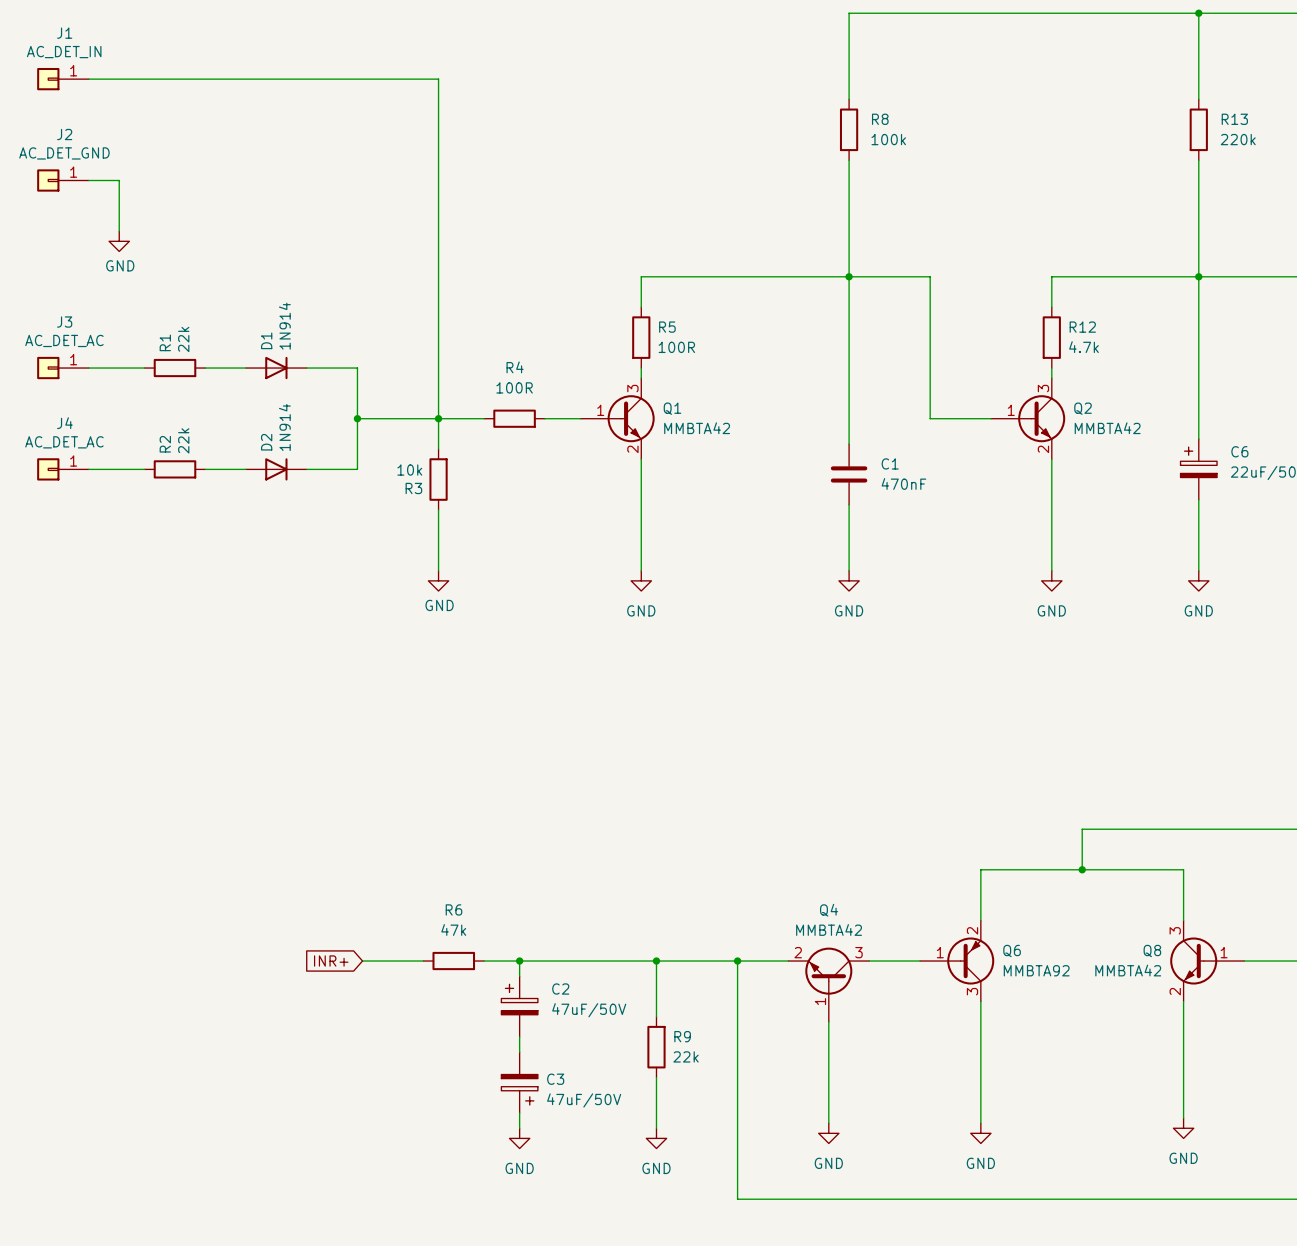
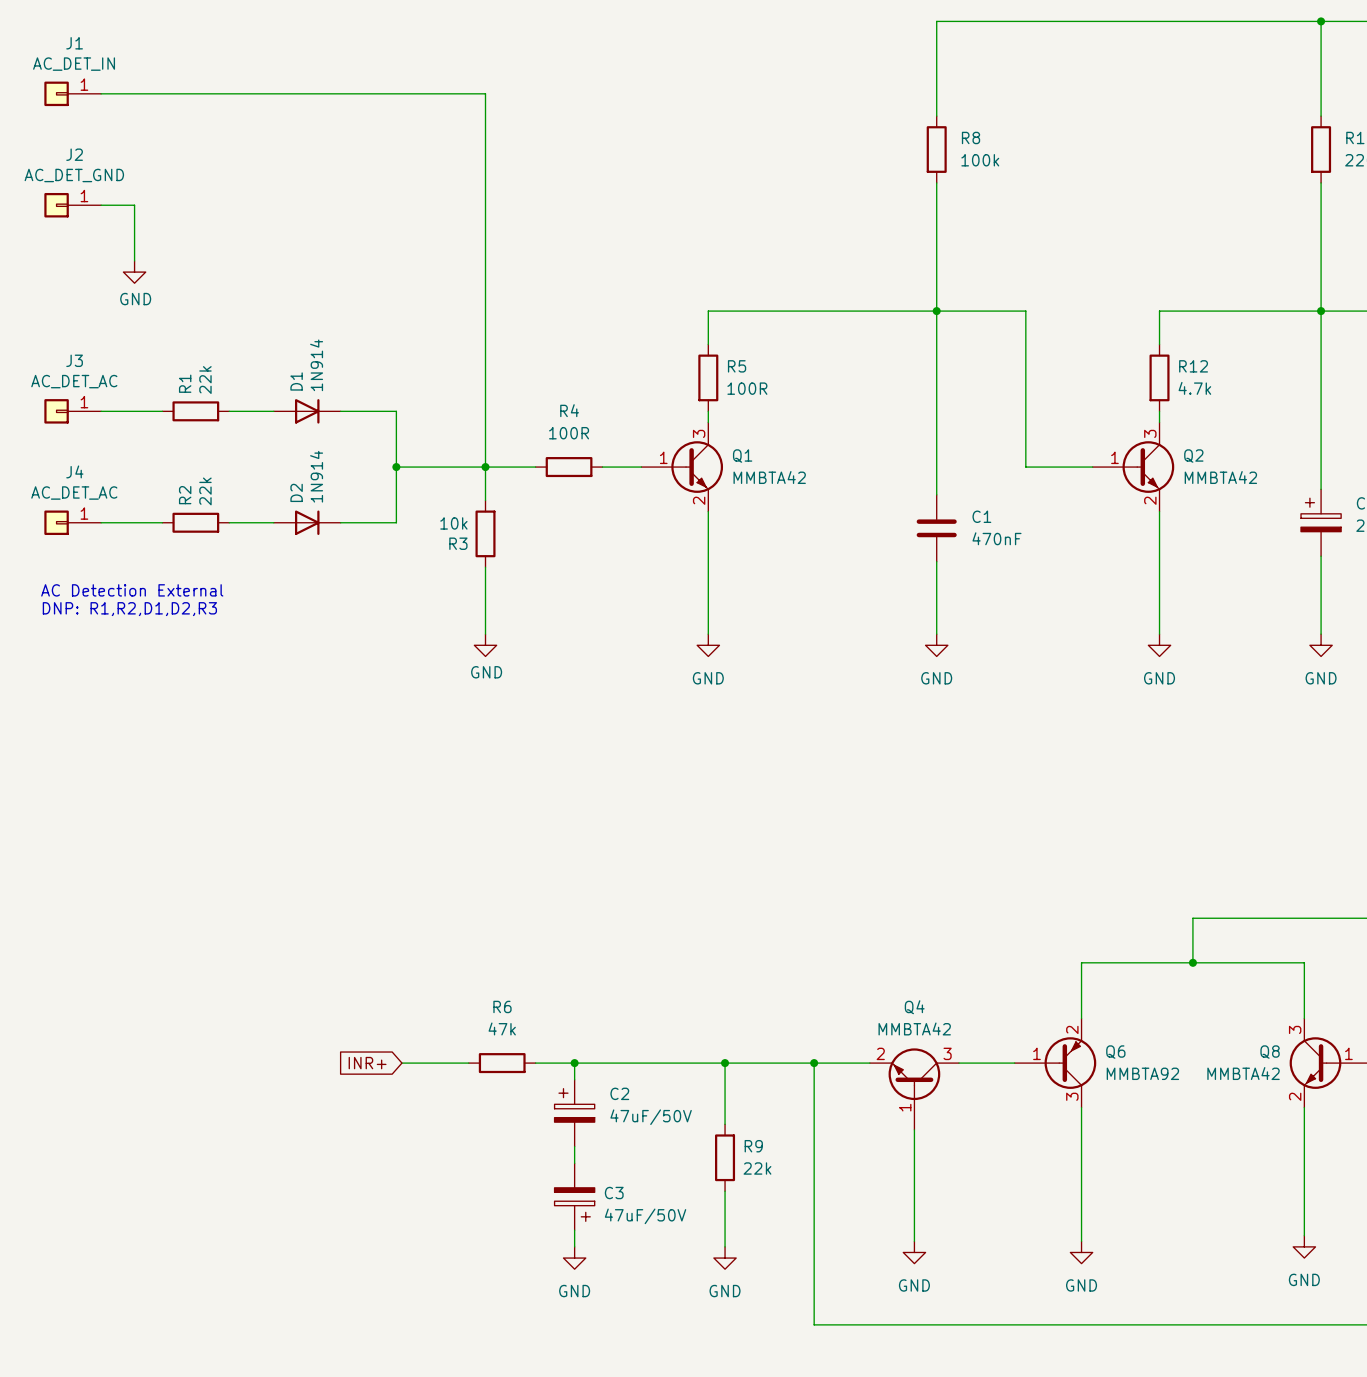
text: none -> AC Detection External (132, 590)
text: none -> DNP: R1,R2,D1,D2,R3 (129, 609)

